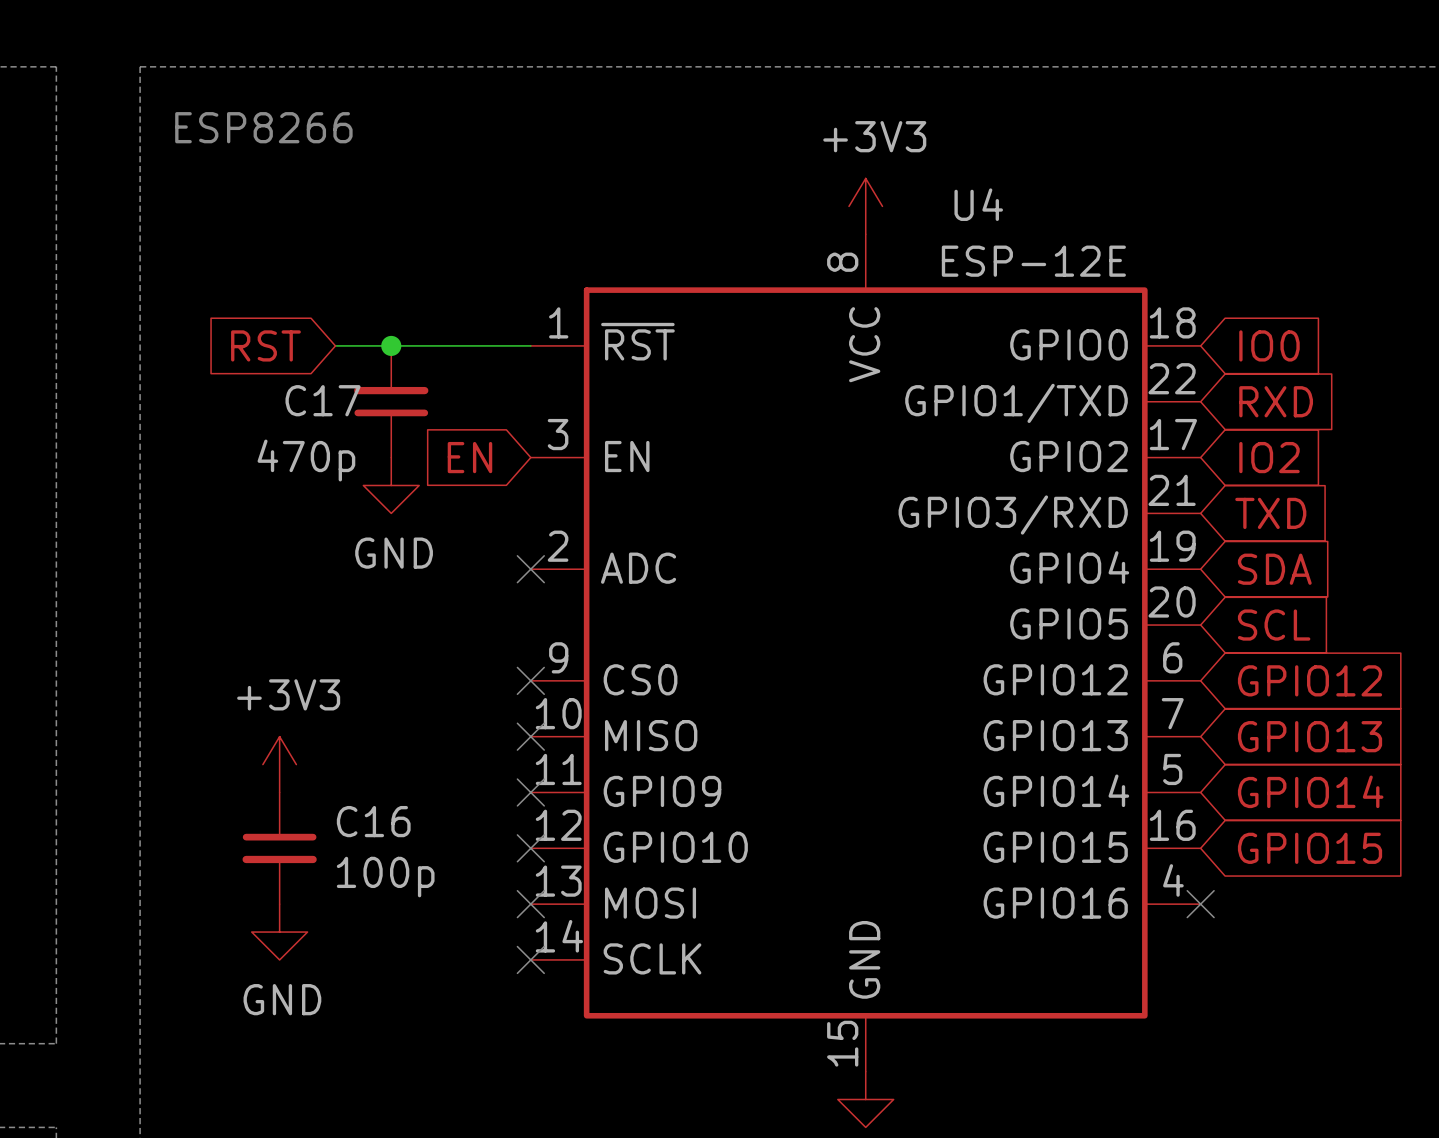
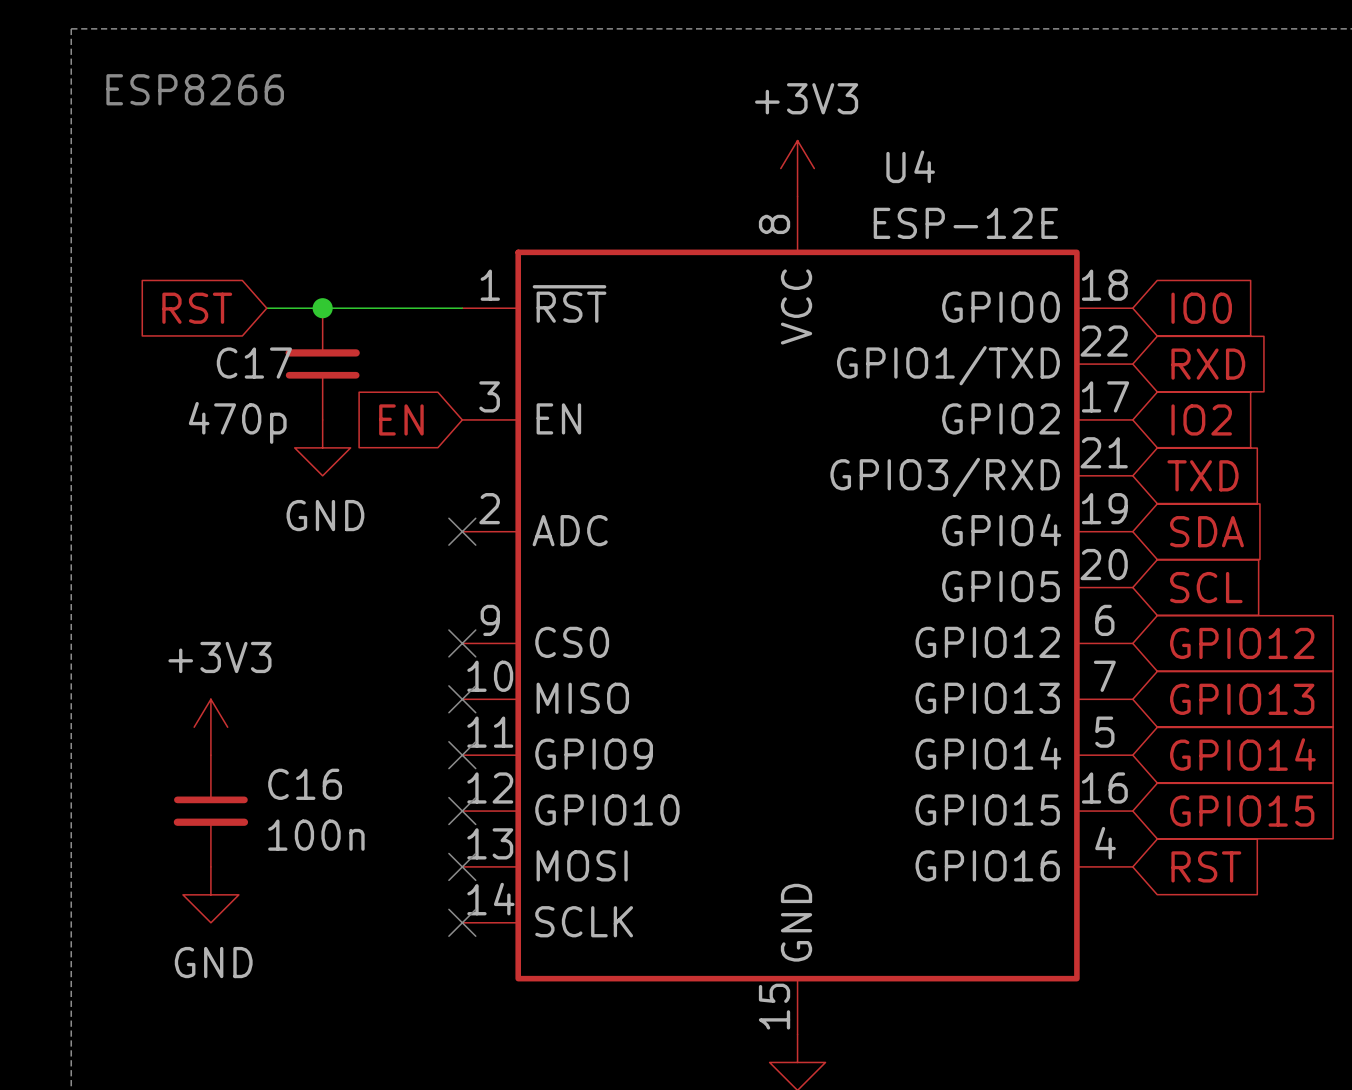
C16 value: 100p (385, 877) -> 100n (316, 835)
no-connect mark: (1200, 904) -> none
global label: none -> RST (1206, 866)

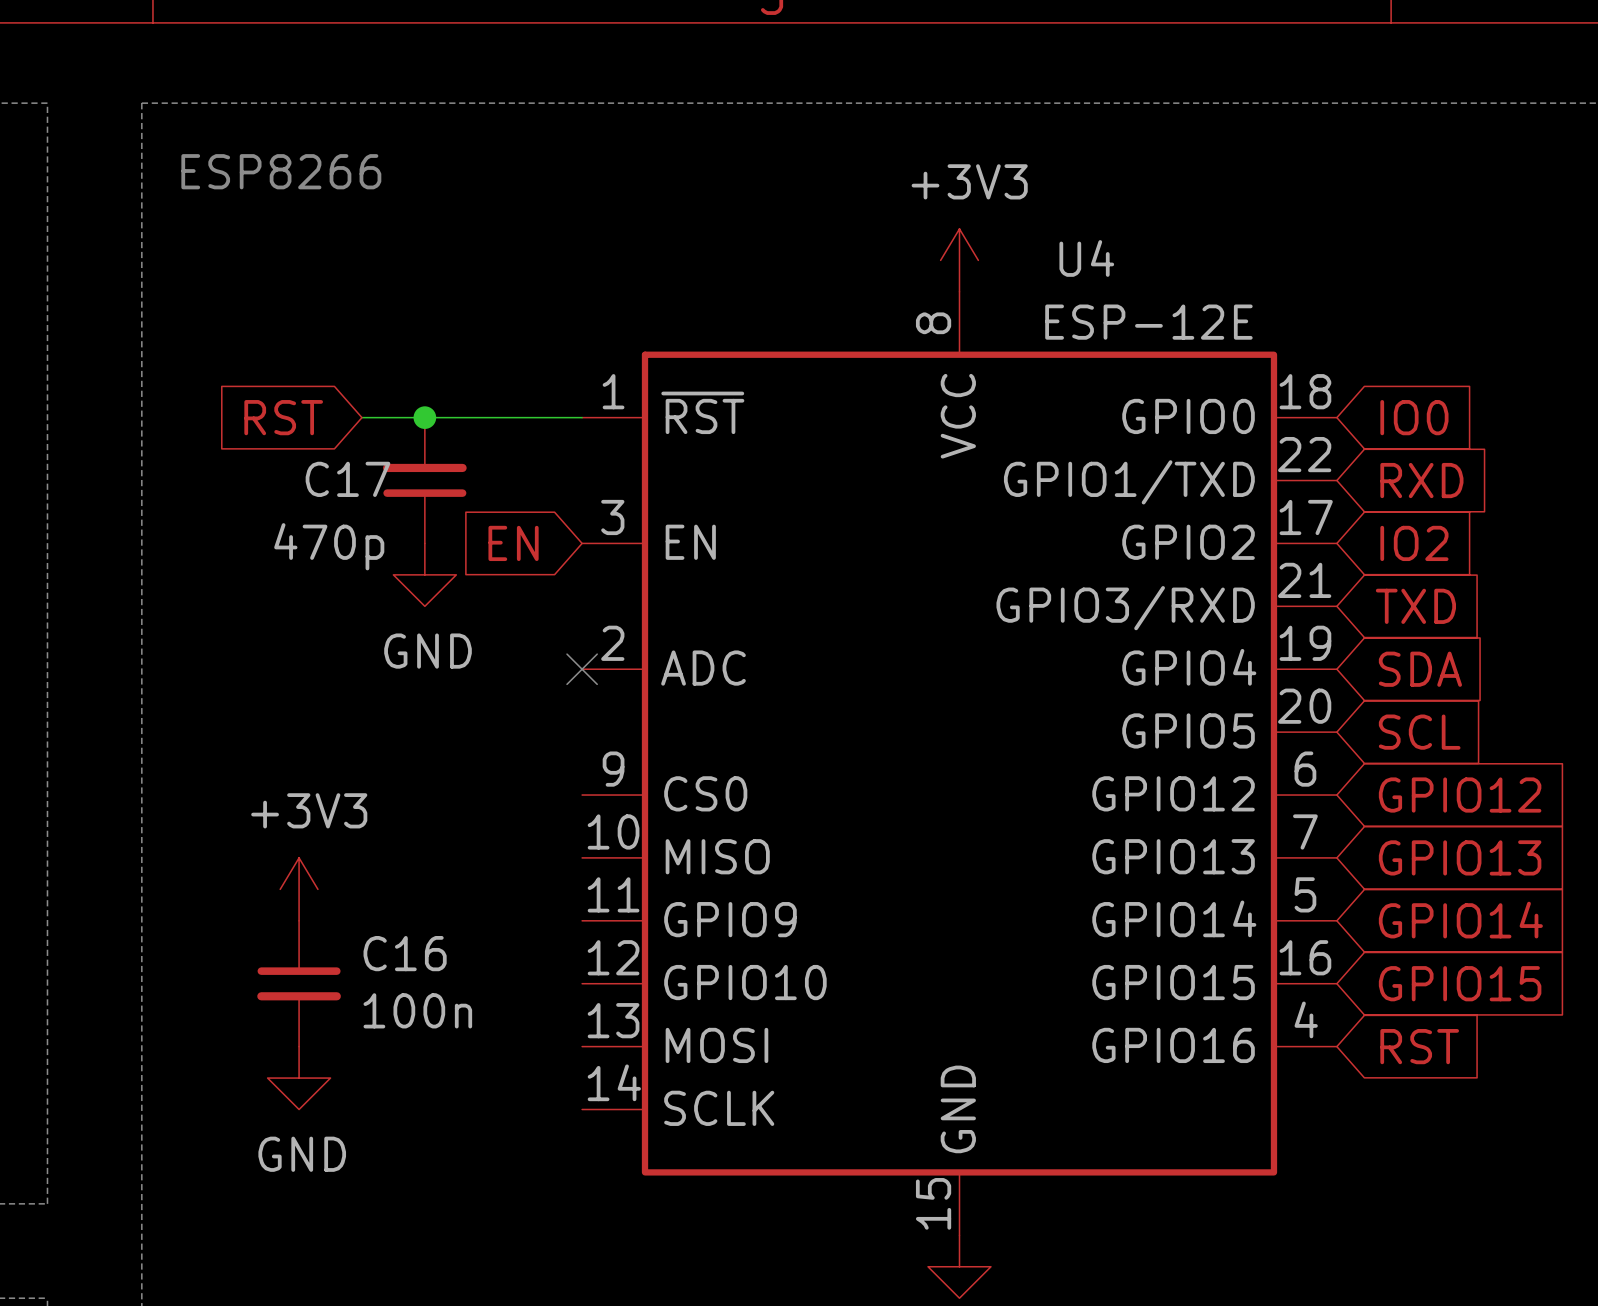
no-connect mark: (462, 643) -> none
no-connect mark: (462, 699) -> none
no-connect mark: (462, 755) -> none
no-connect mark: (462, 811) -> none
no-connect mark: (462, 866) -> none
no-connect mark: (462, 922) -> none

